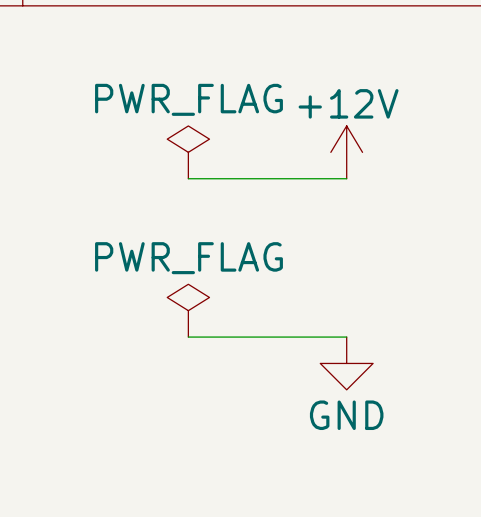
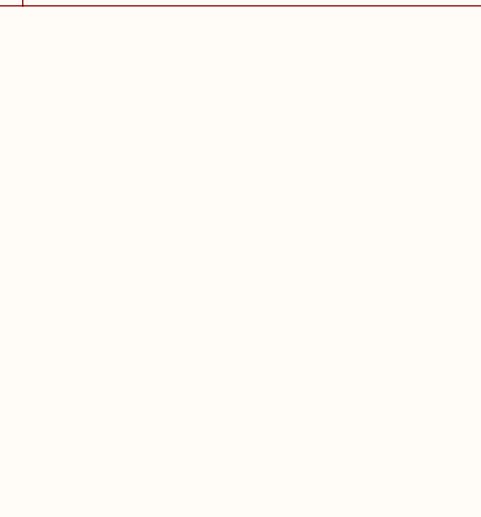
power symbol: PWR_FLAG (188, 152) -> none
power symbol: +12V (346, 152) -> none
wire: (188, 178) (346, 178) -> none
power symbol: PWR_FLAG (188, 310) -> none
wire: (188, 337) (346, 337) -> none
power symbol: GND (346, 363) -> none

